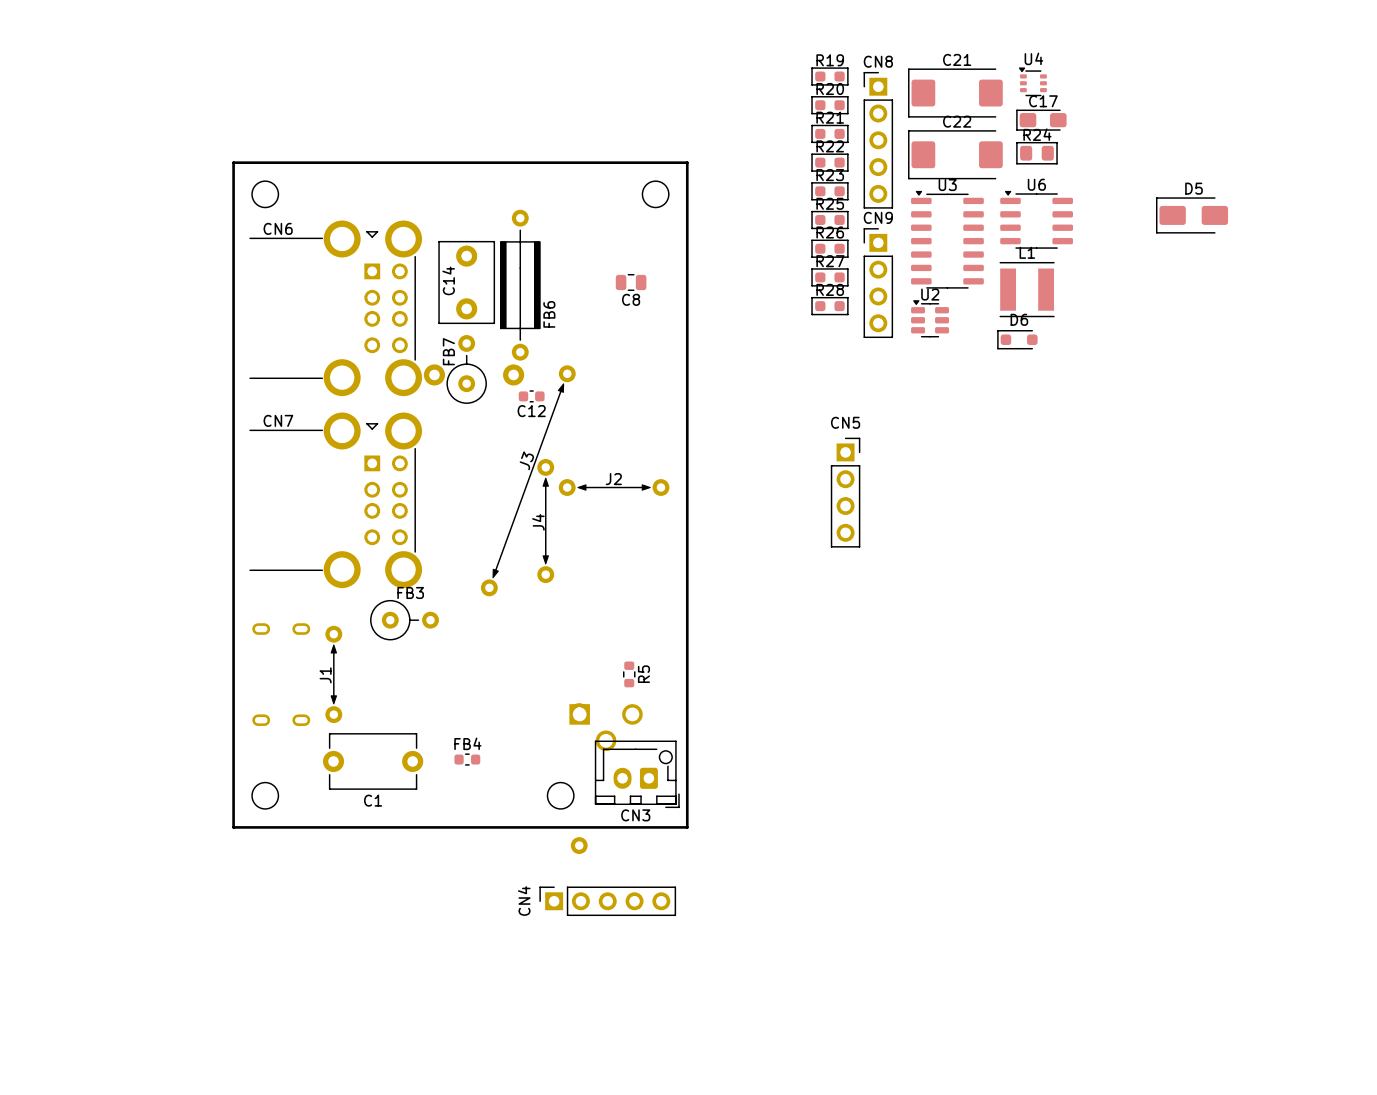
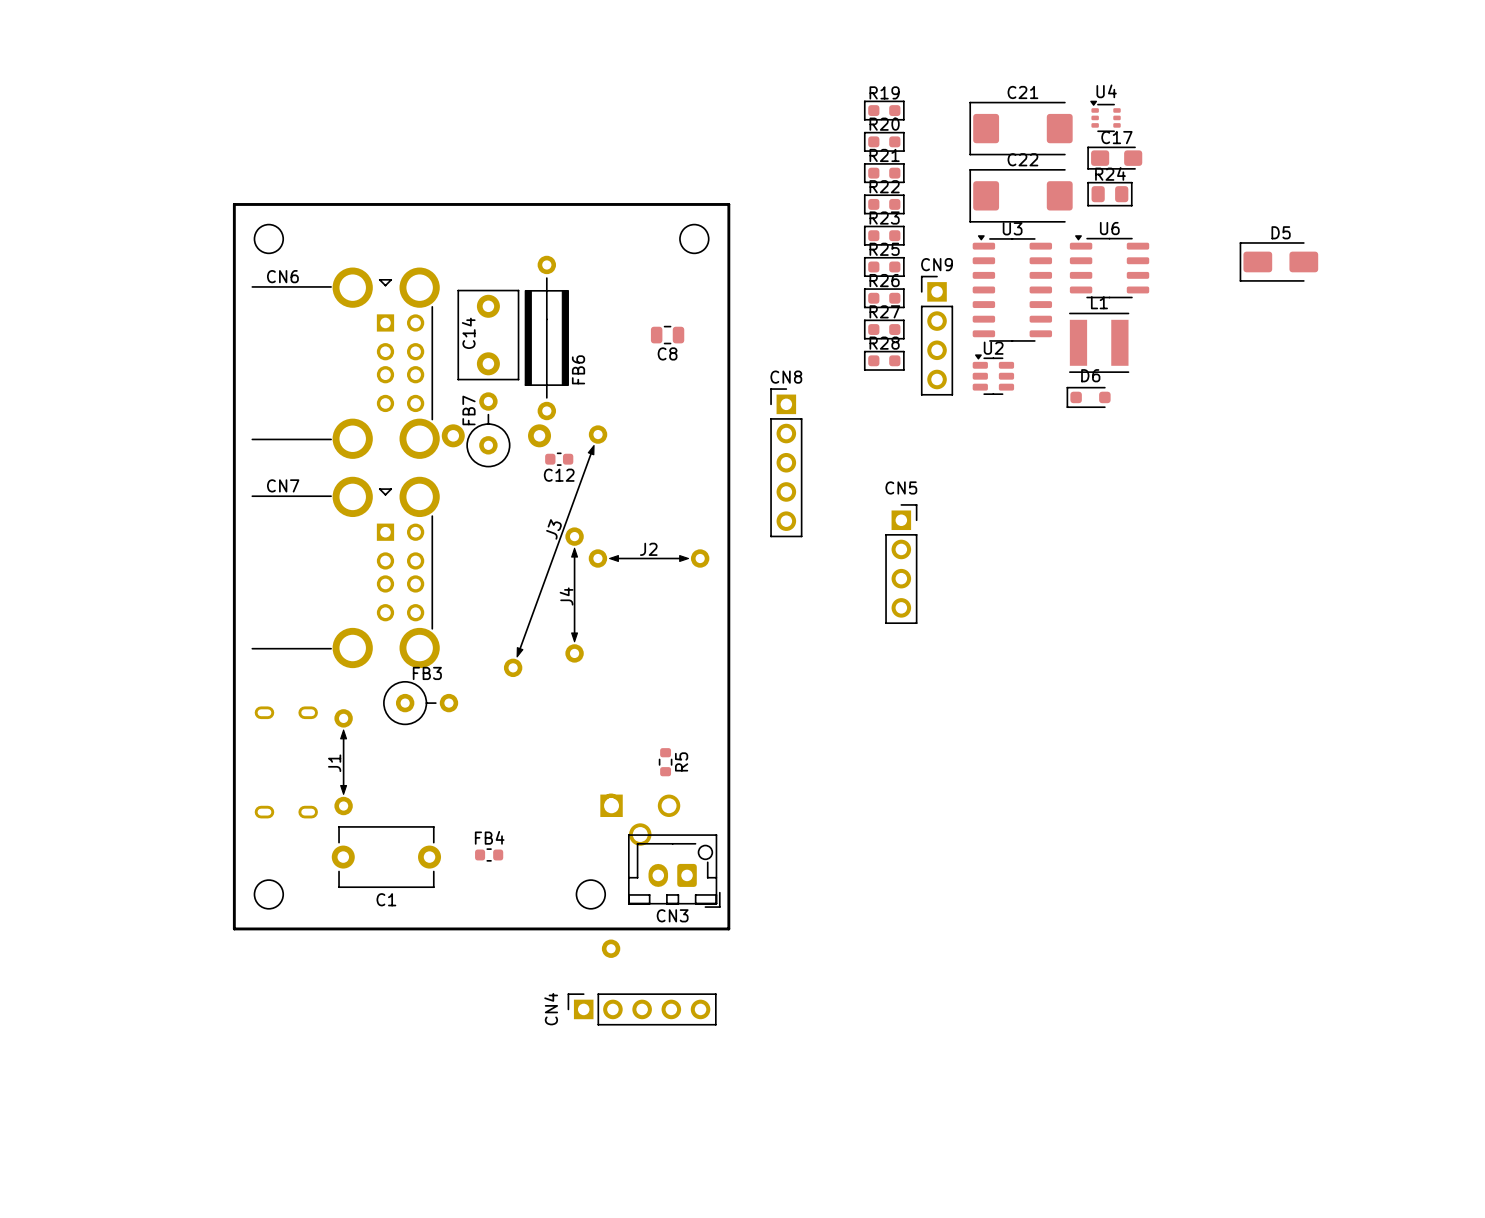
CN8 position: (878, 140) -> (786, 462)

